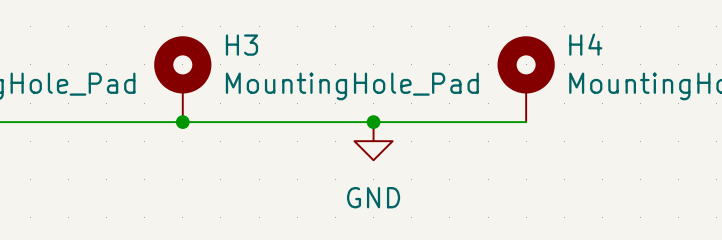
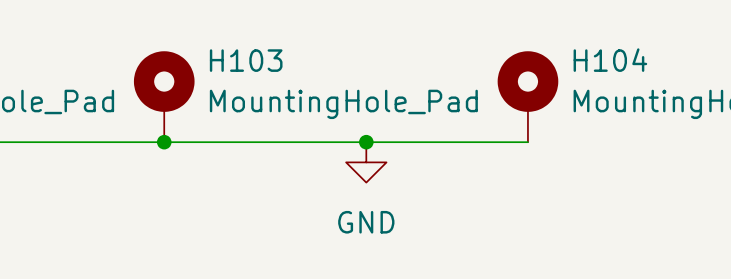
H4 name: H4 (585, 44) -> H104 (610, 60)
H3 name: H3 (241, 45) -> H103 (246, 60)

